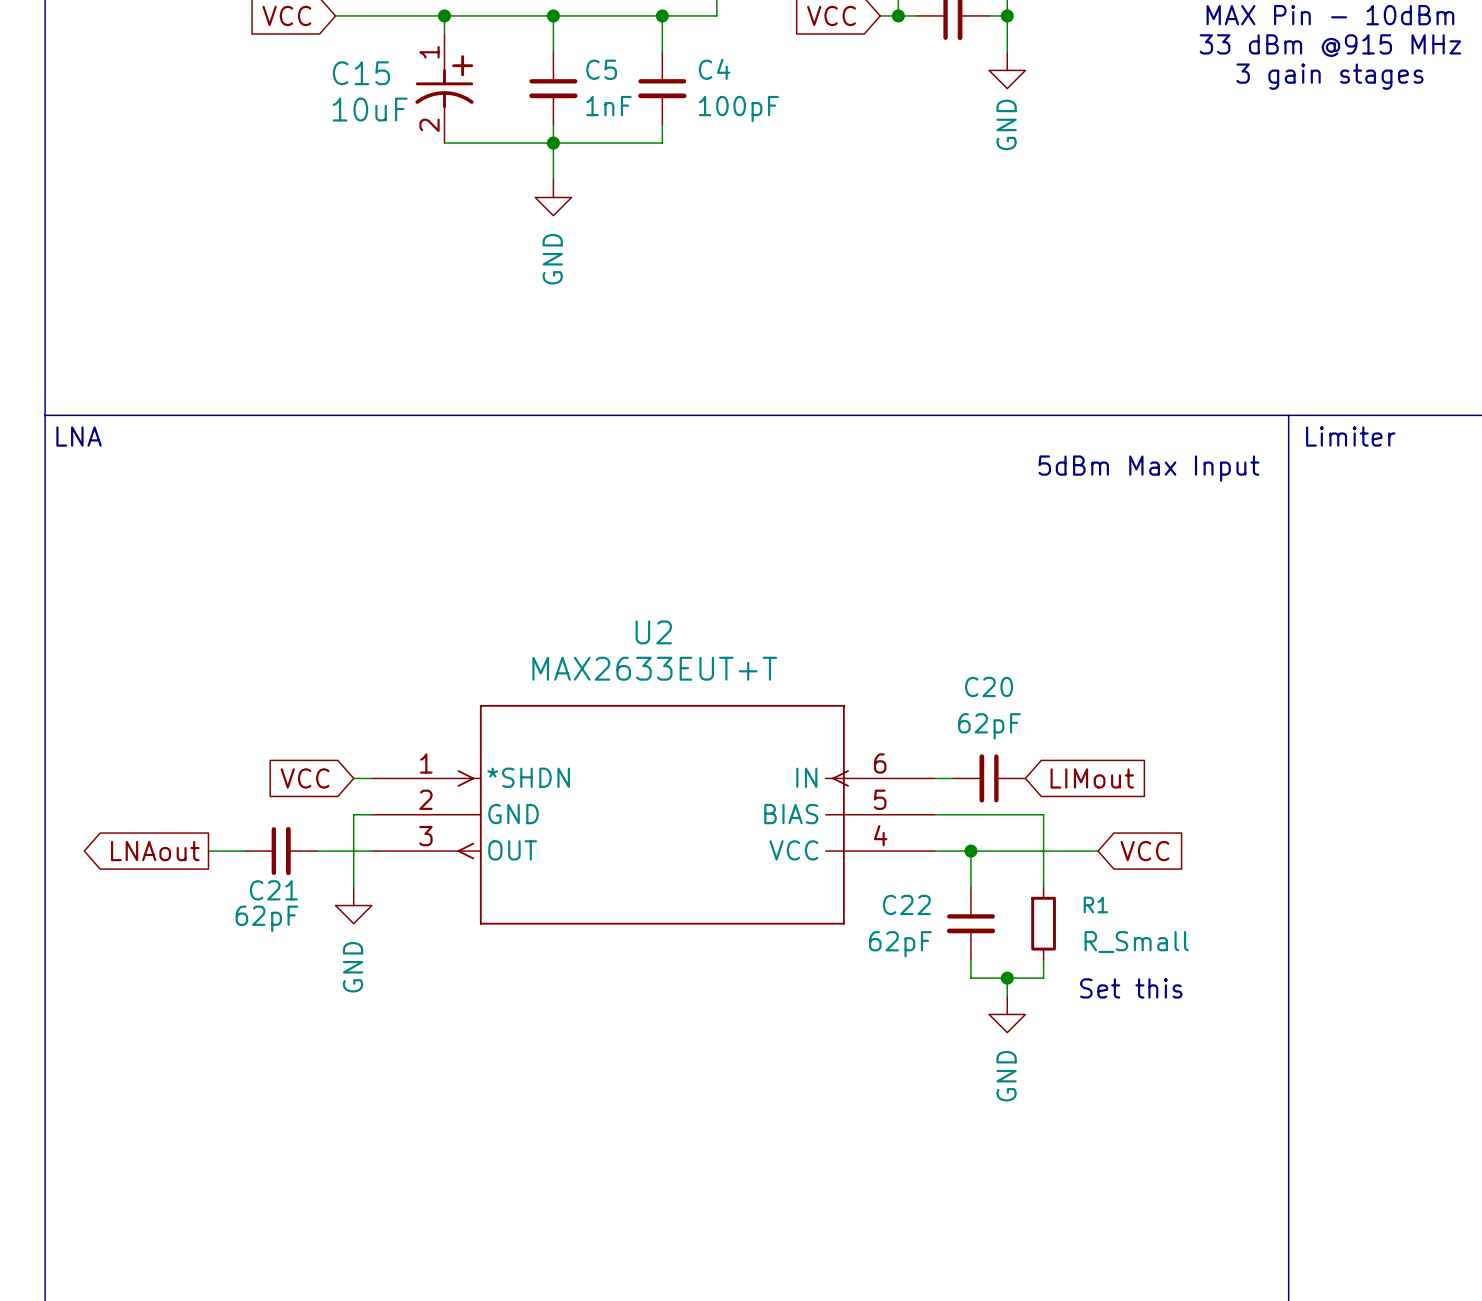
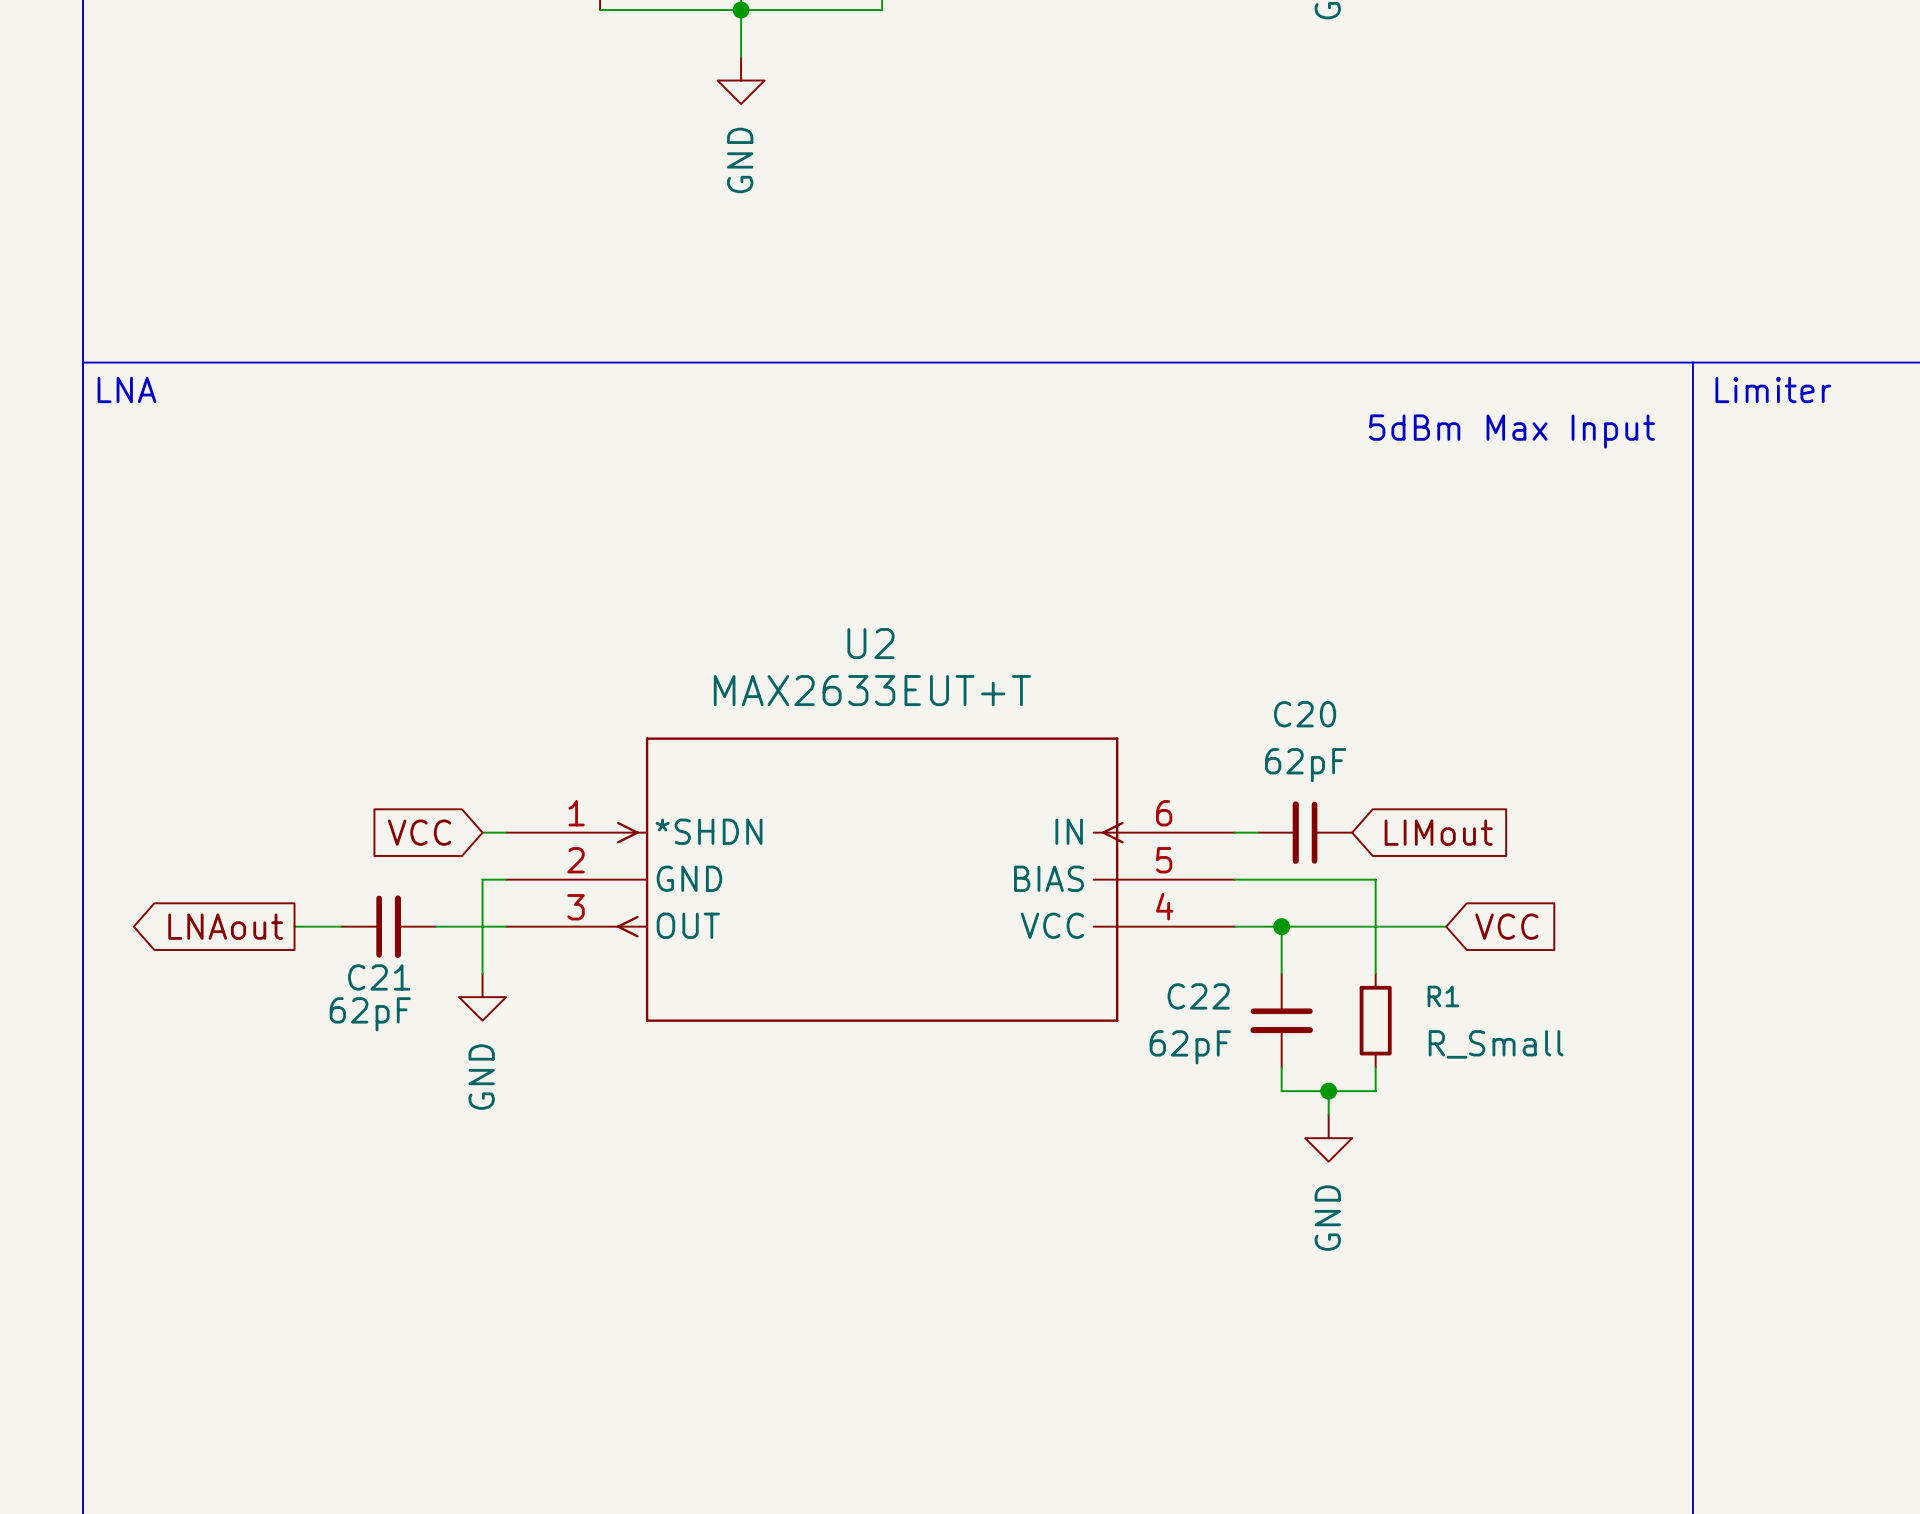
text: Set this (1131, 988) -> none

